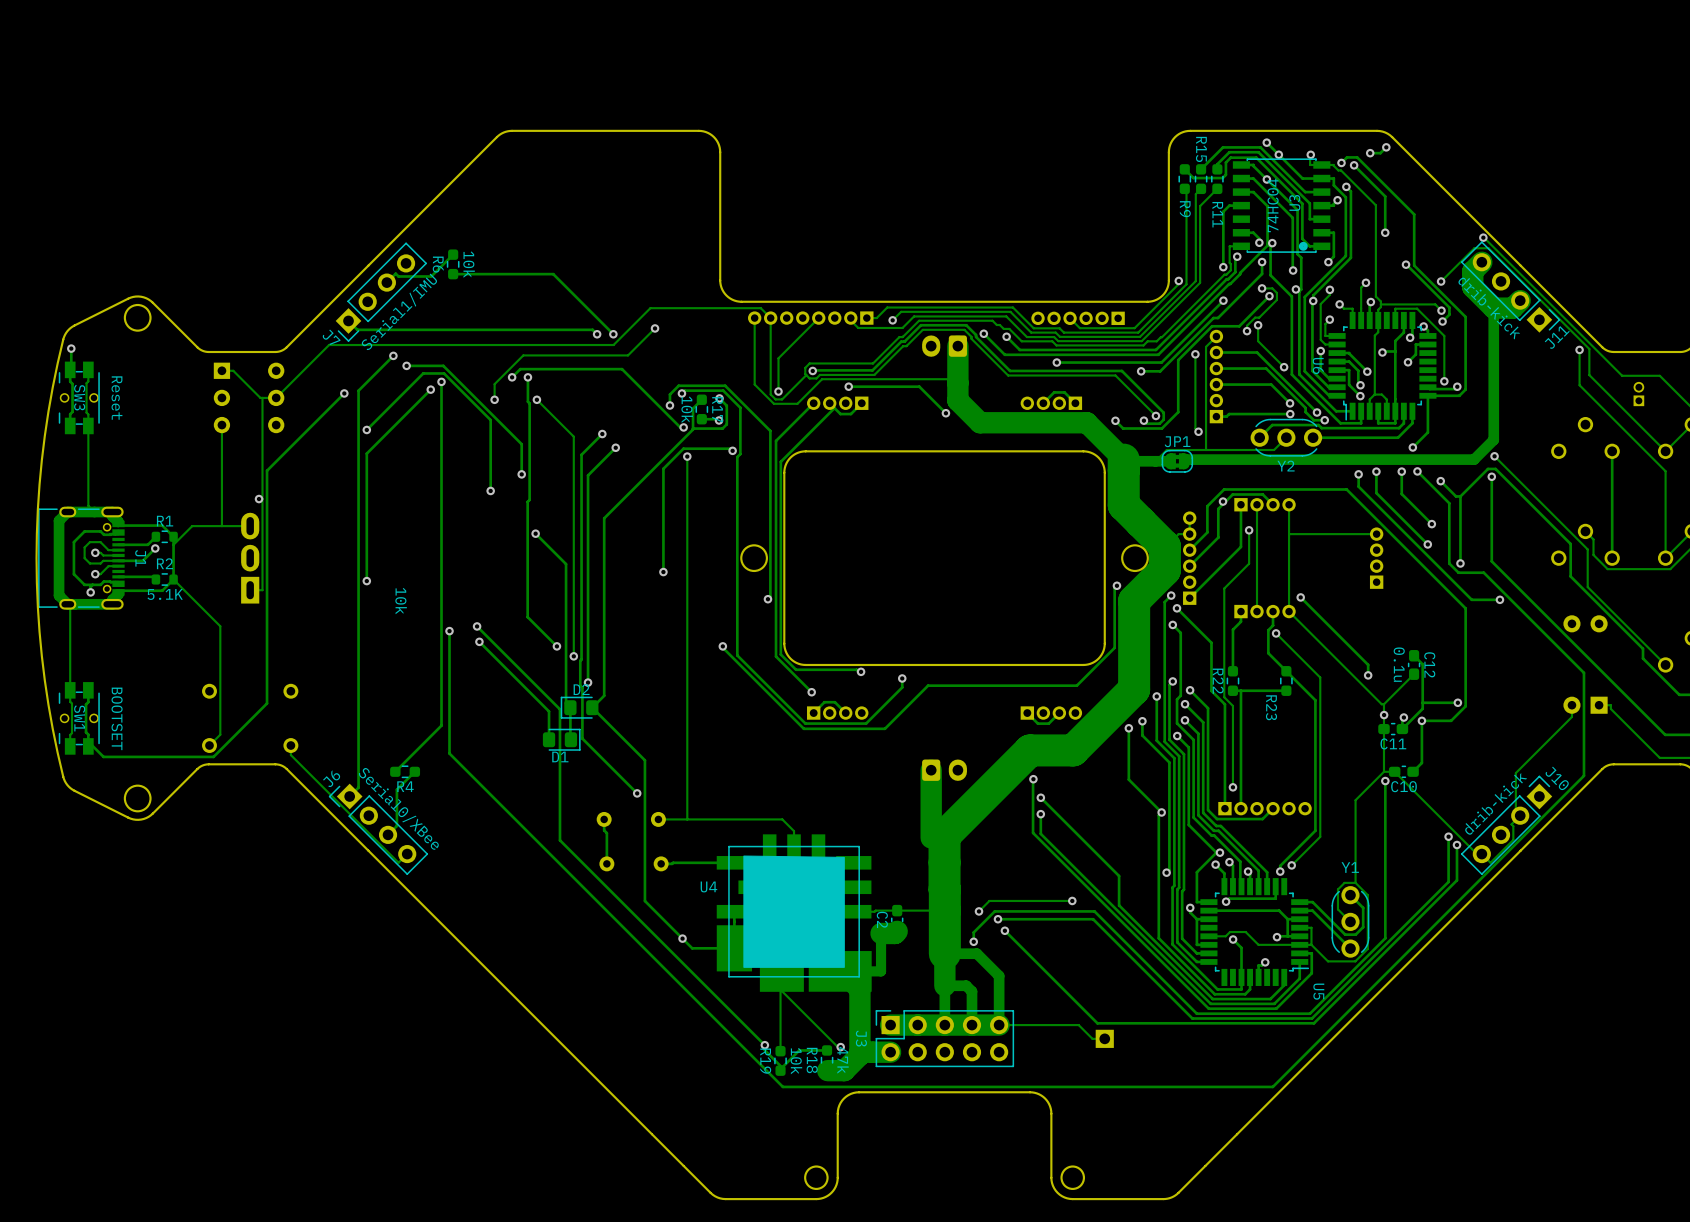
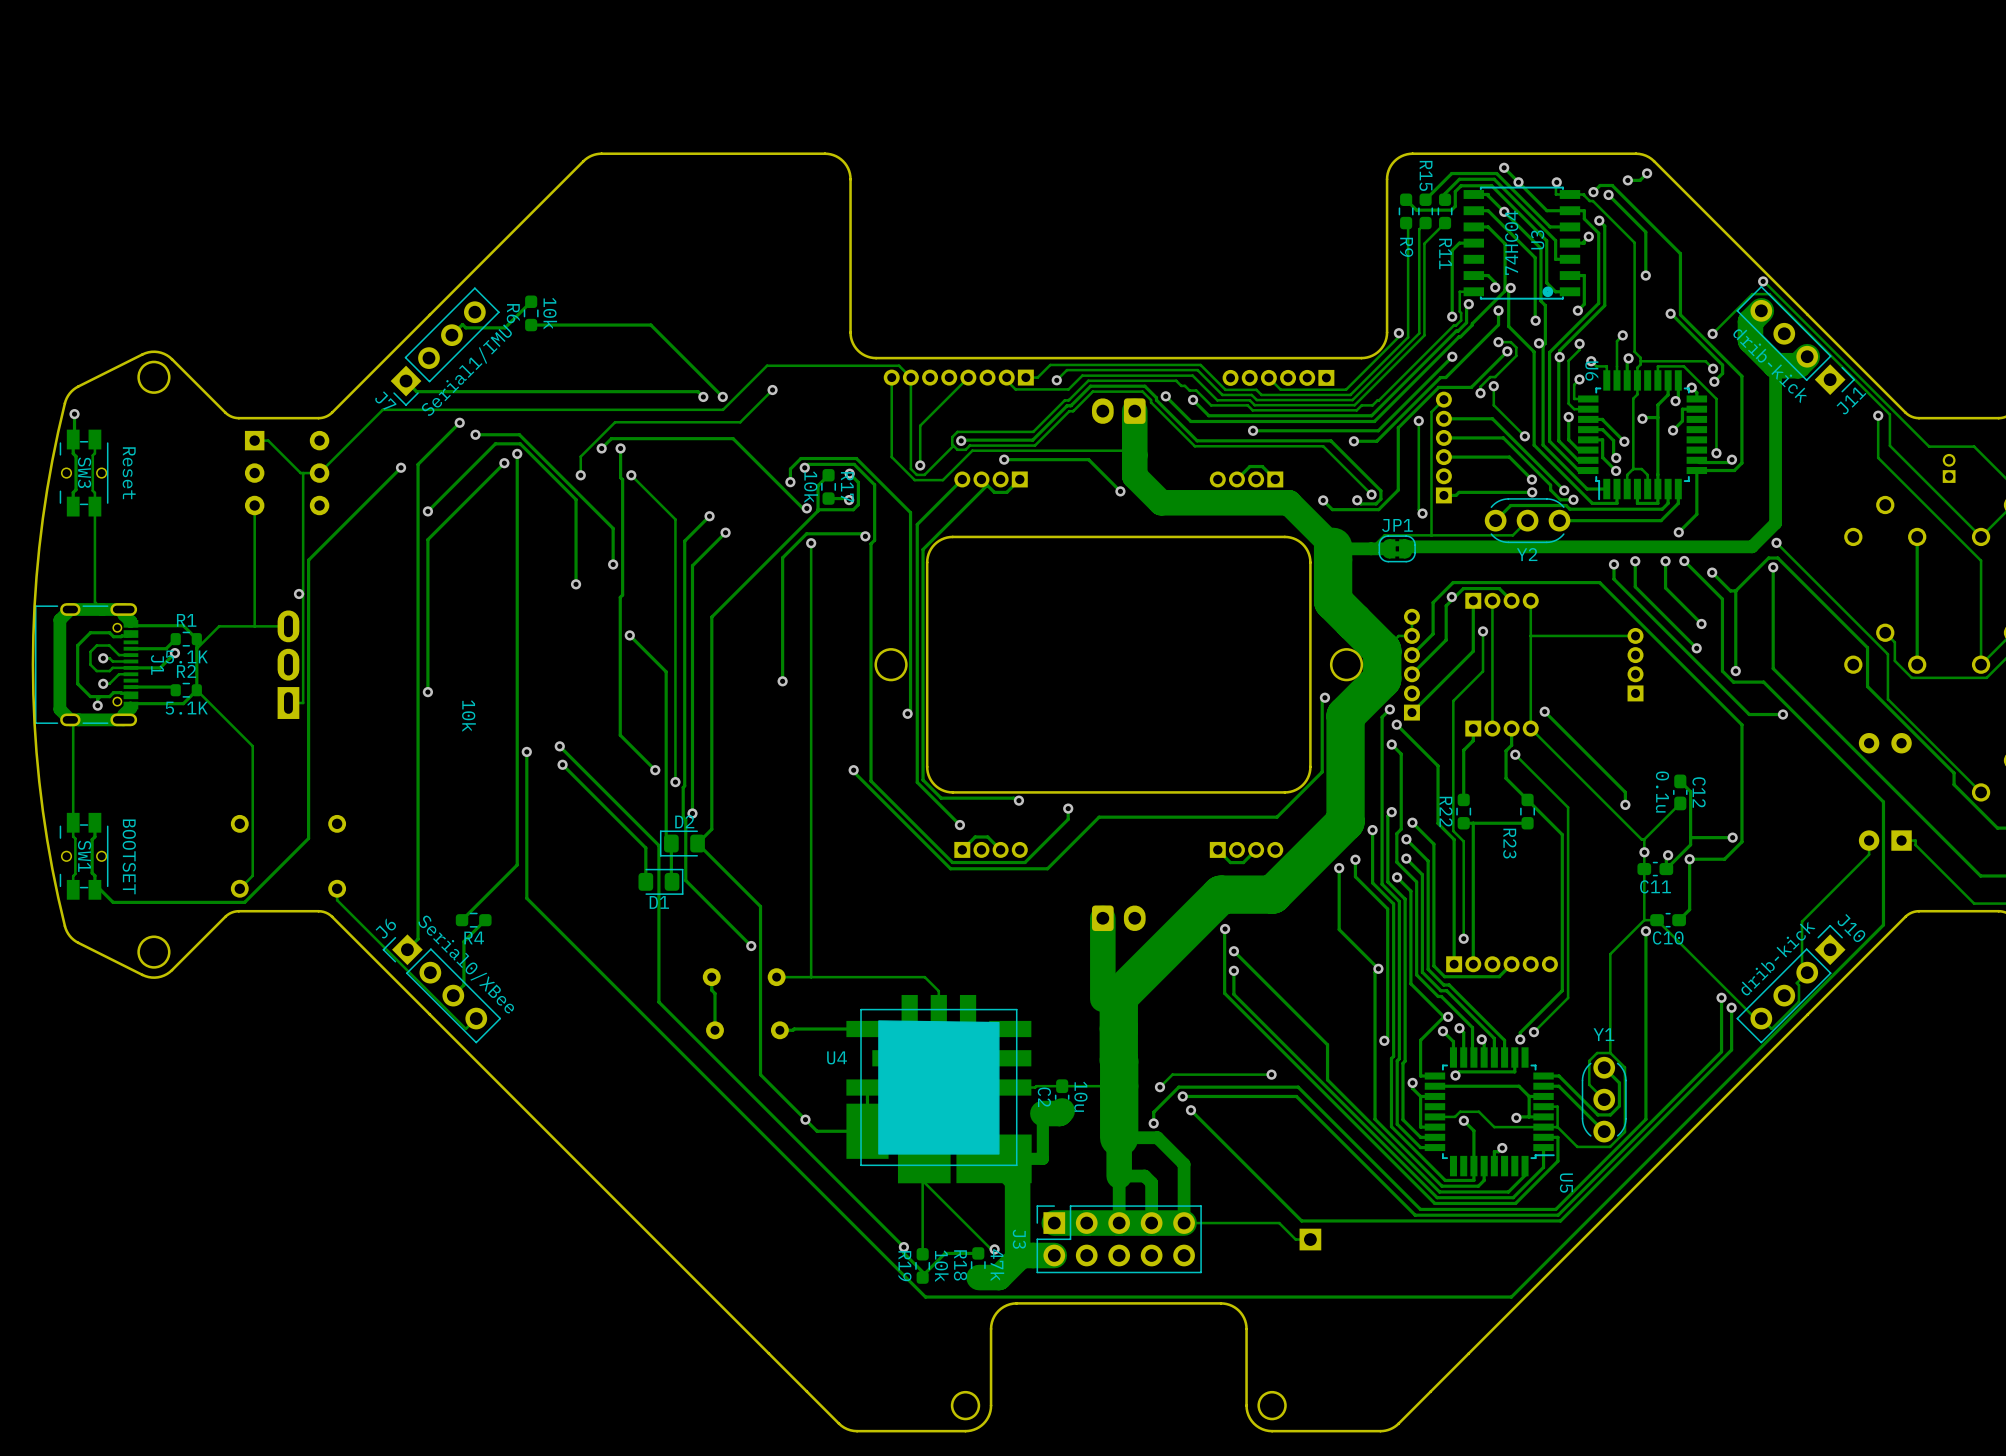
U6 name position: U6 (1318, 365) -> U6 (1591, 371)
R1 value: none -> 5.1K (186, 657)
C2 value: none -> 10u (1080, 1096)

